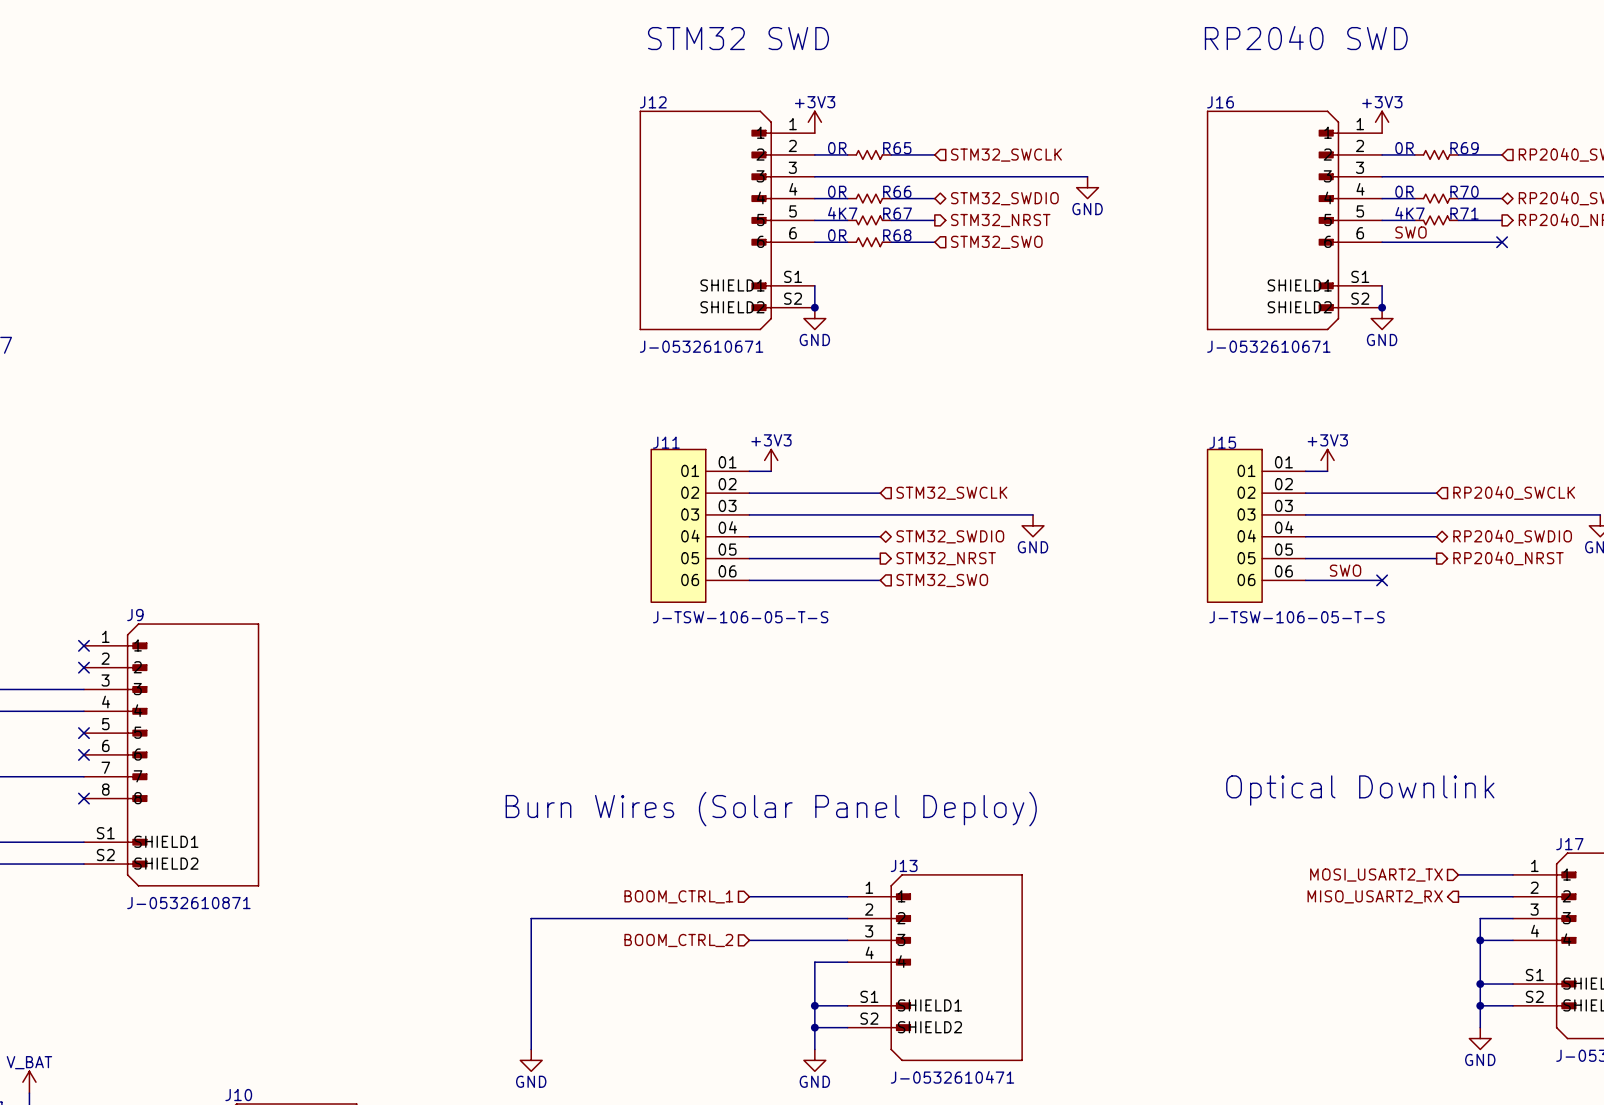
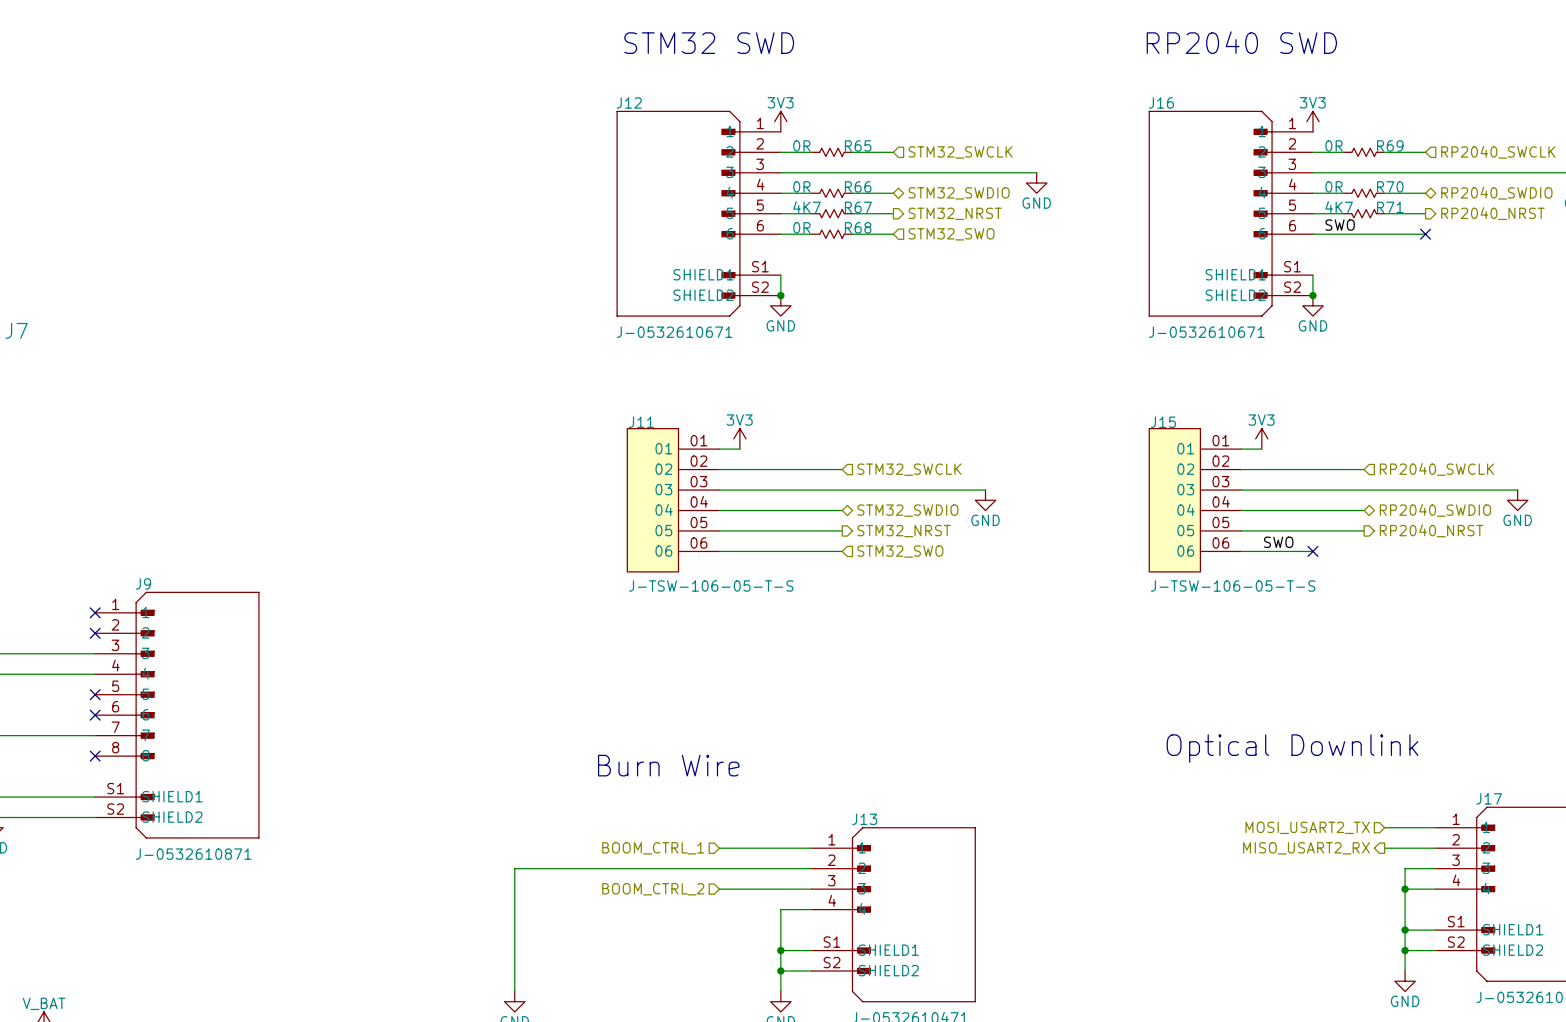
power symbol: +3V3 (814, 122) -> 3V3 (780, 121)
power symbol: +3V3 (1382, 122) -> 3V3 (1312, 121)
power symbol: +3V3 (771, 460) -> 3V3 (739, 438)
power symbol: +3V3 (1327, 460) -> 3V3 (1261, 438)
text: none -> Burn Wire (668, 765)
text: Burn Wires (Solar Panel Deploy) (771, 809) -> none

